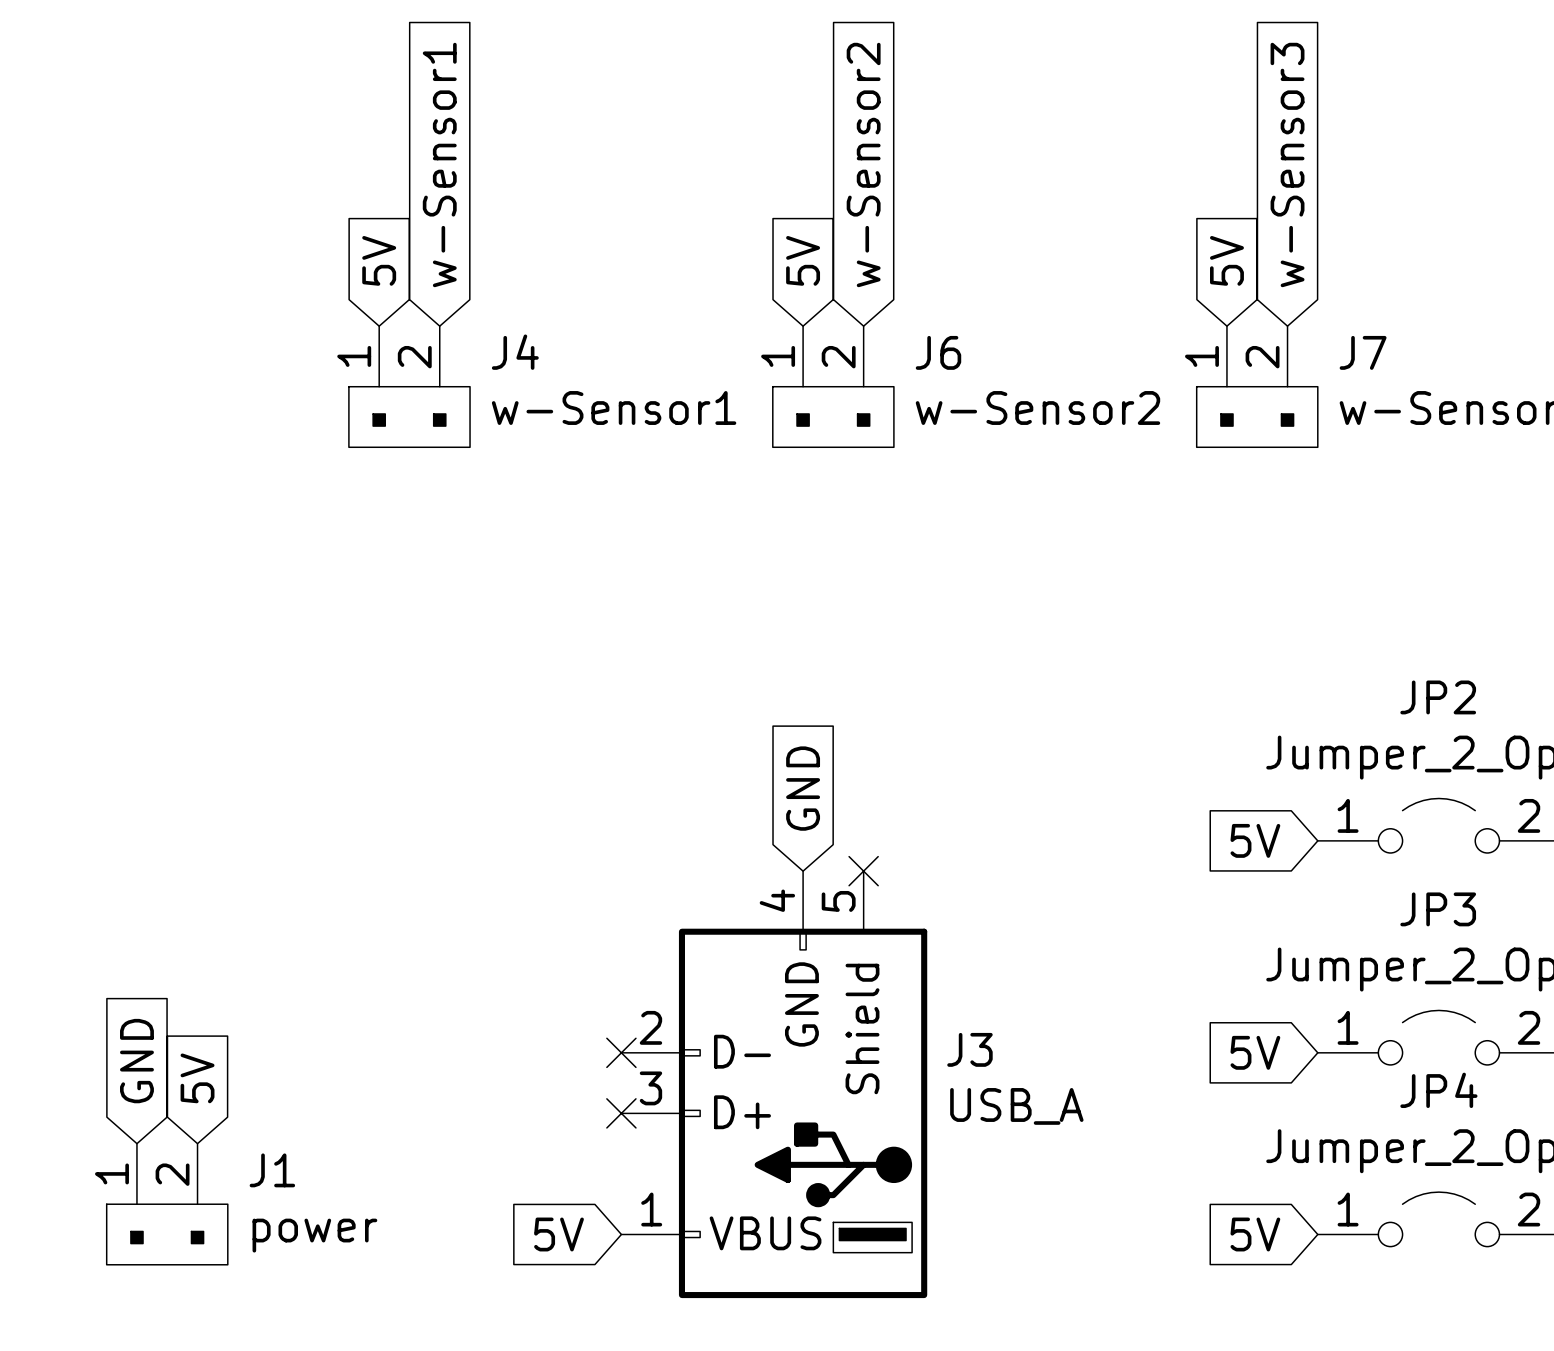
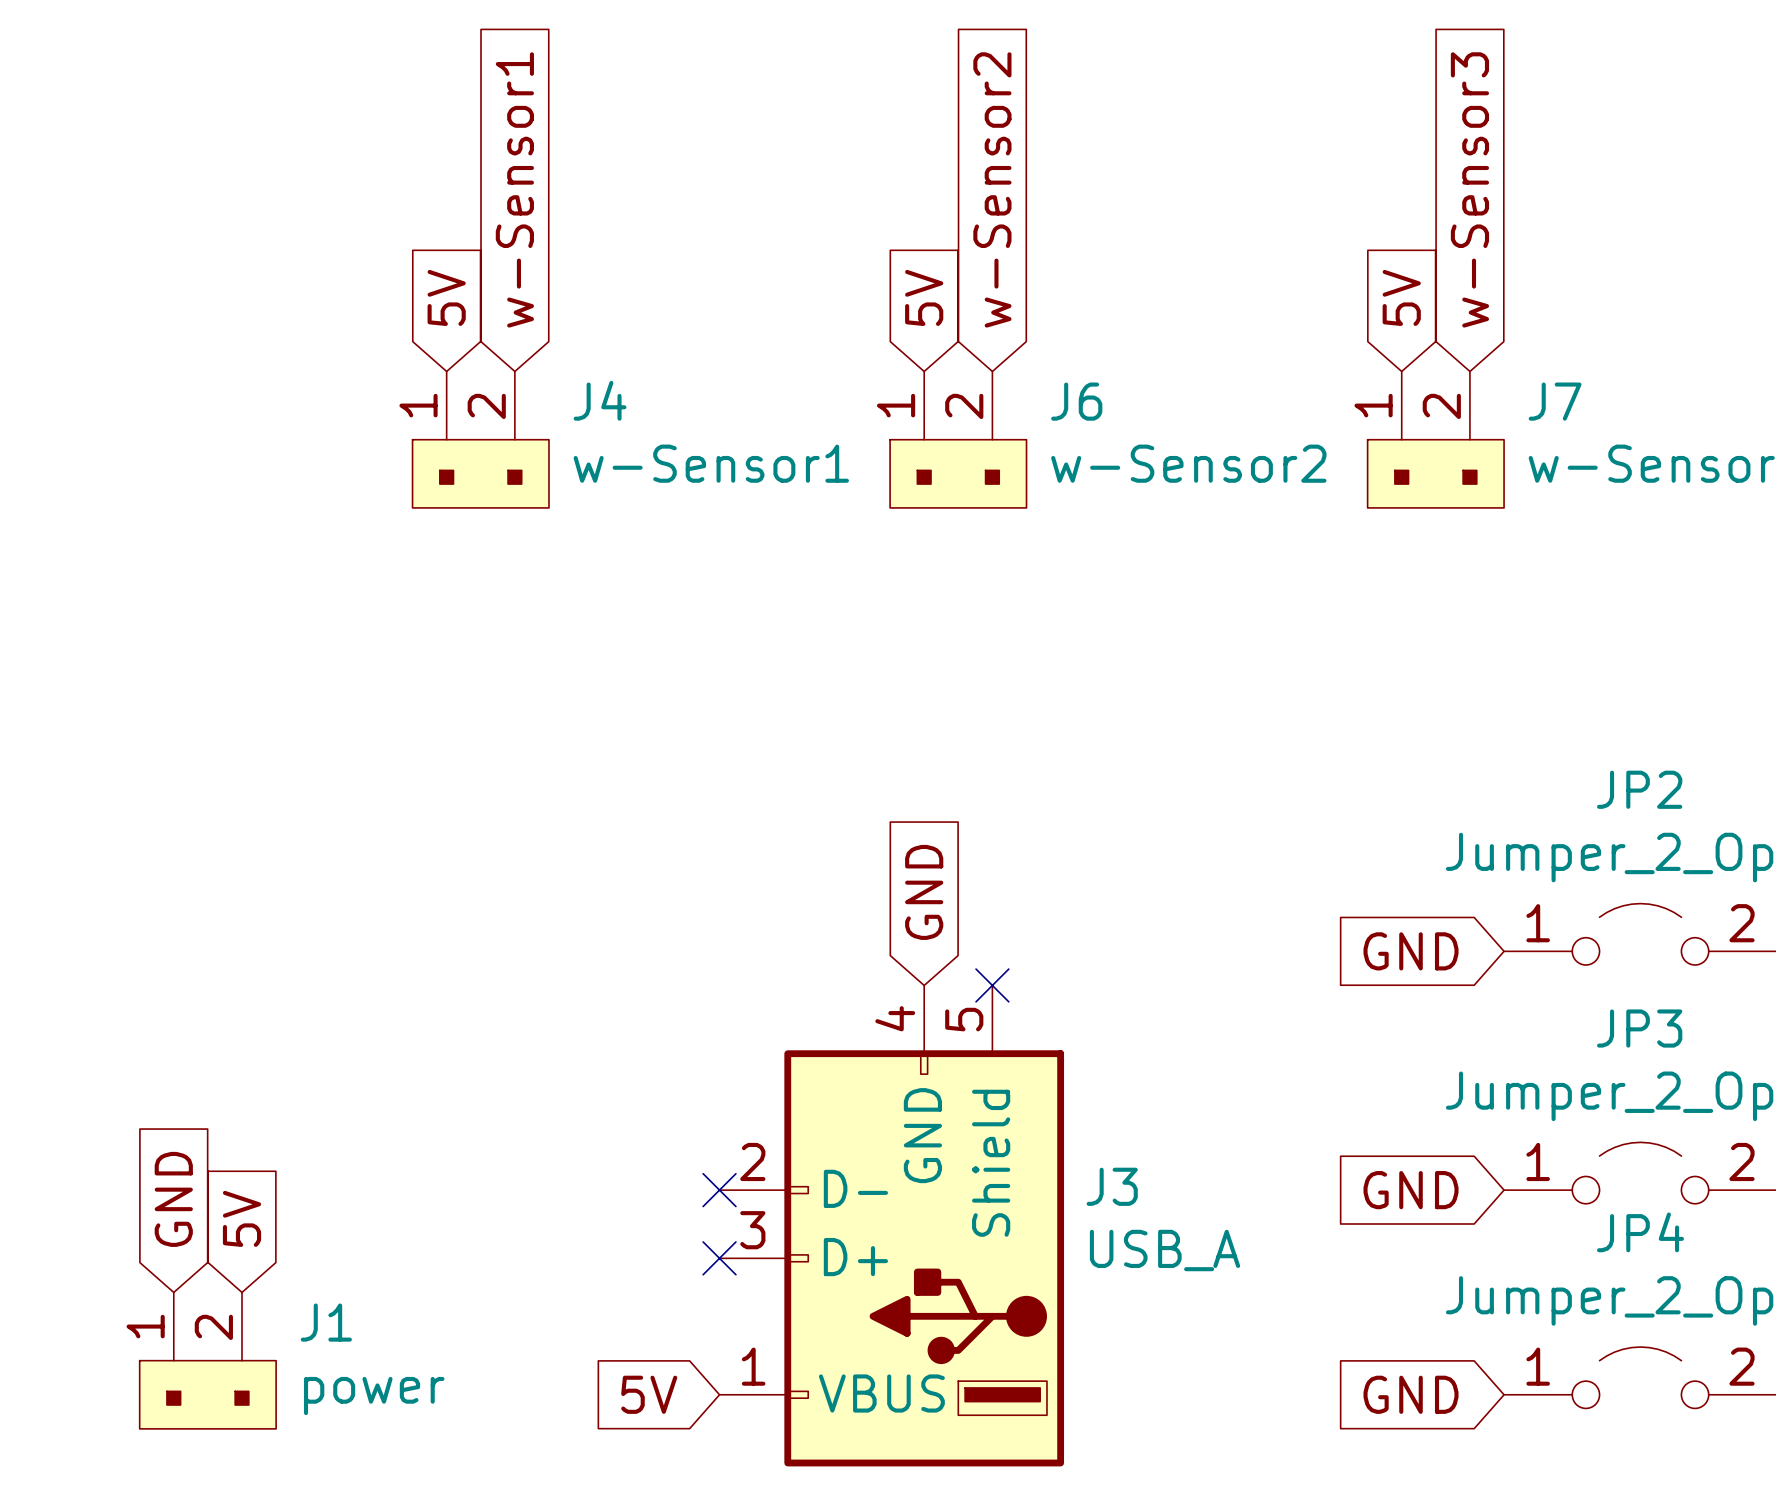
global label: 5V (1255, 840) -> GND (1411, 951)
global label: 5V (1255, 1052) -> GND (1411, 1190)
global label: 5V (1255, 1234) -> GND (1411, 1394)

